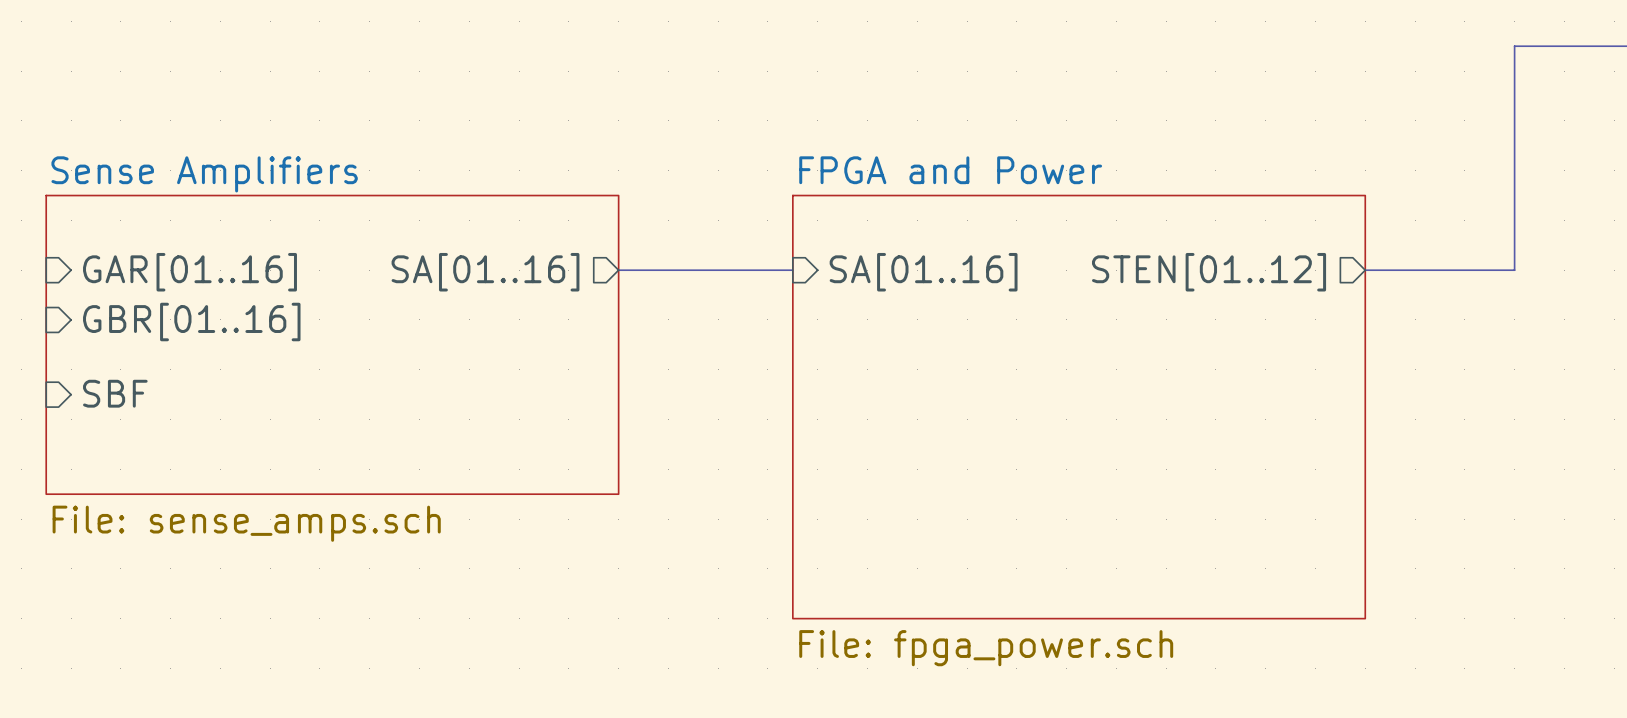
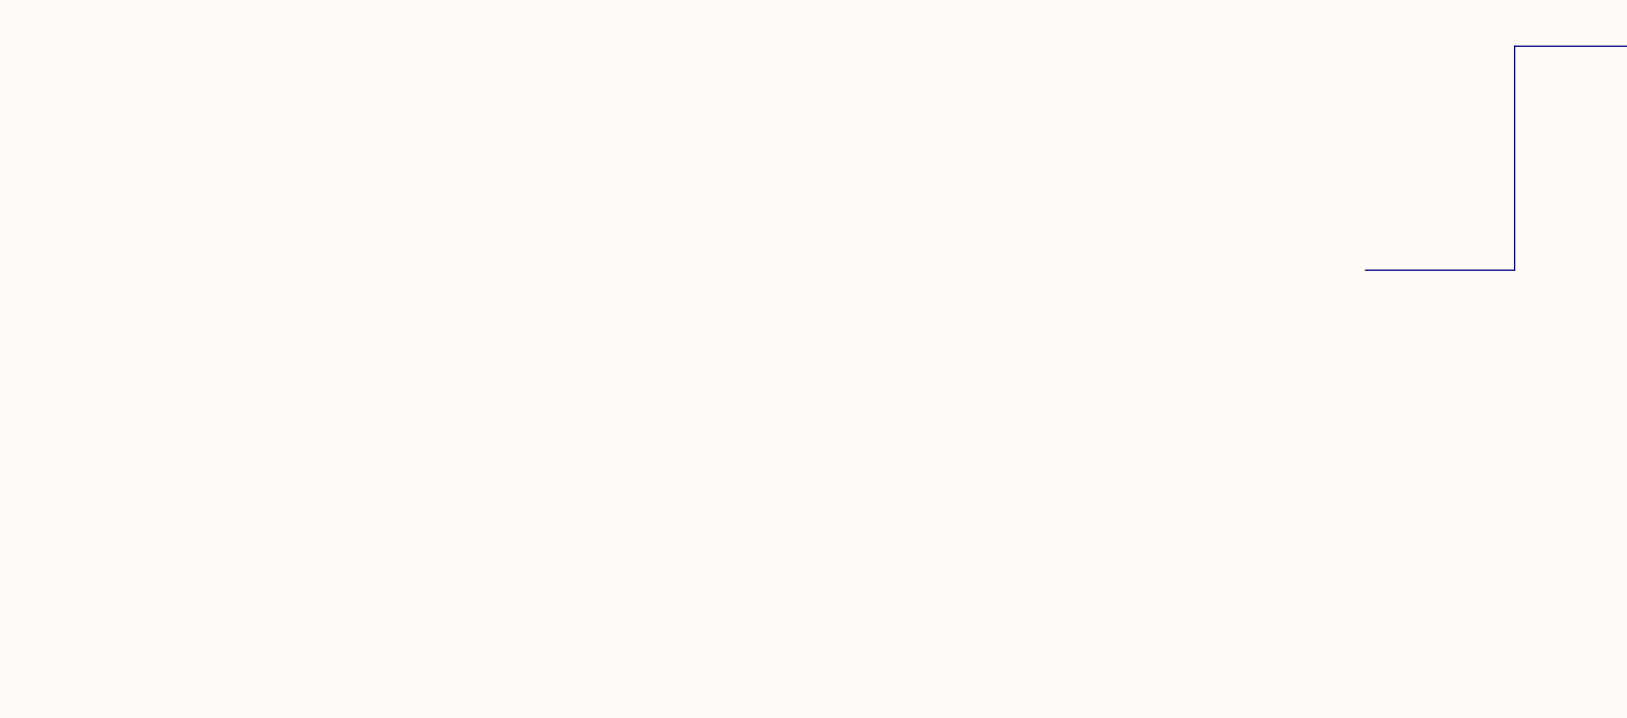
bus: (618, 270) (792, 270) -> none
sheet pin: GAR[01..16] (190, 272) -> none
sheet pin: SA[01..16] (485, 272) -> none
sheet pin: SA[01..16] (923, 272) -> none
sheet pin: STEN[01..12] (1209, 272) -> none
sheet pin: GBR[01..16] (191, 322) -> none
sheet Sense Amplifiers: File: sense_amps.sch (332, 344) -> none
sheet pin: SBF (115, 393) -> none
sheet FPGA and Power: File: fpga_power.sch (1079, 407) -> none

